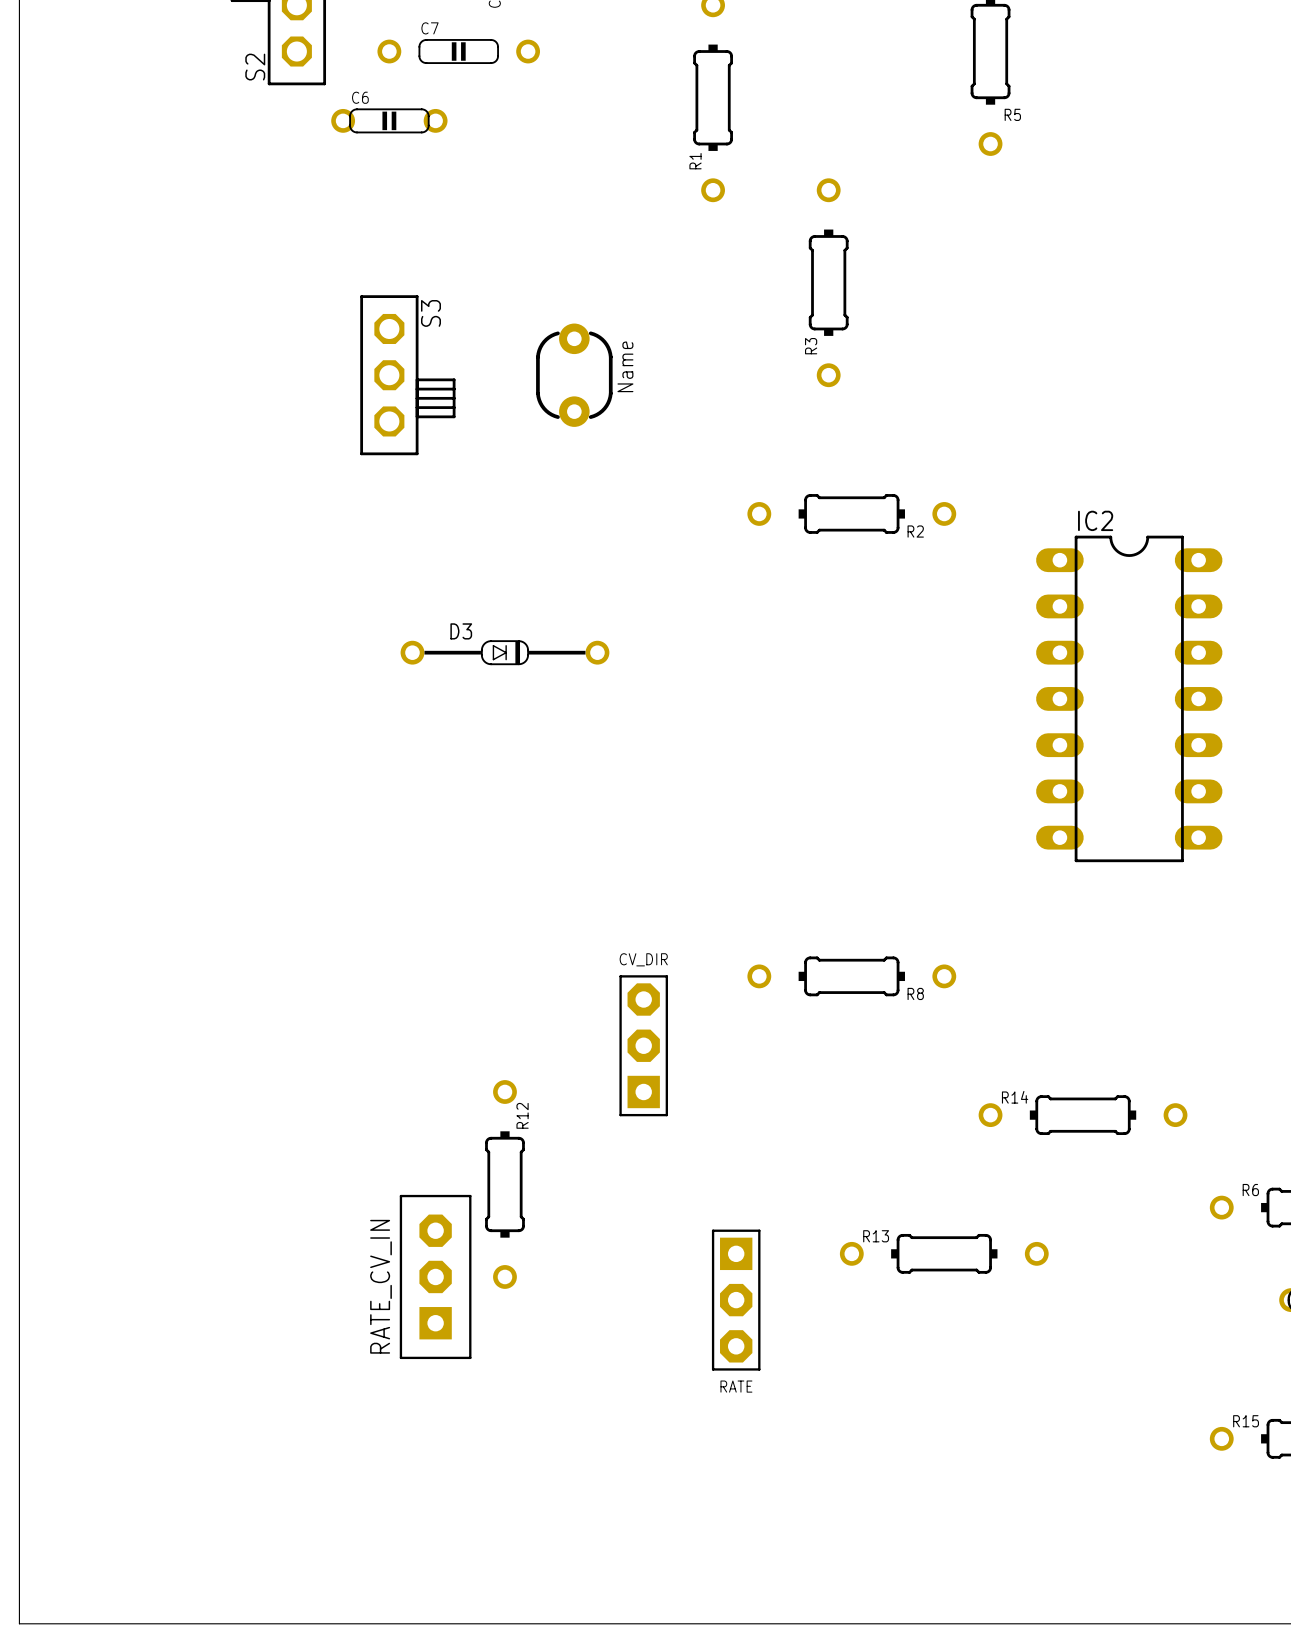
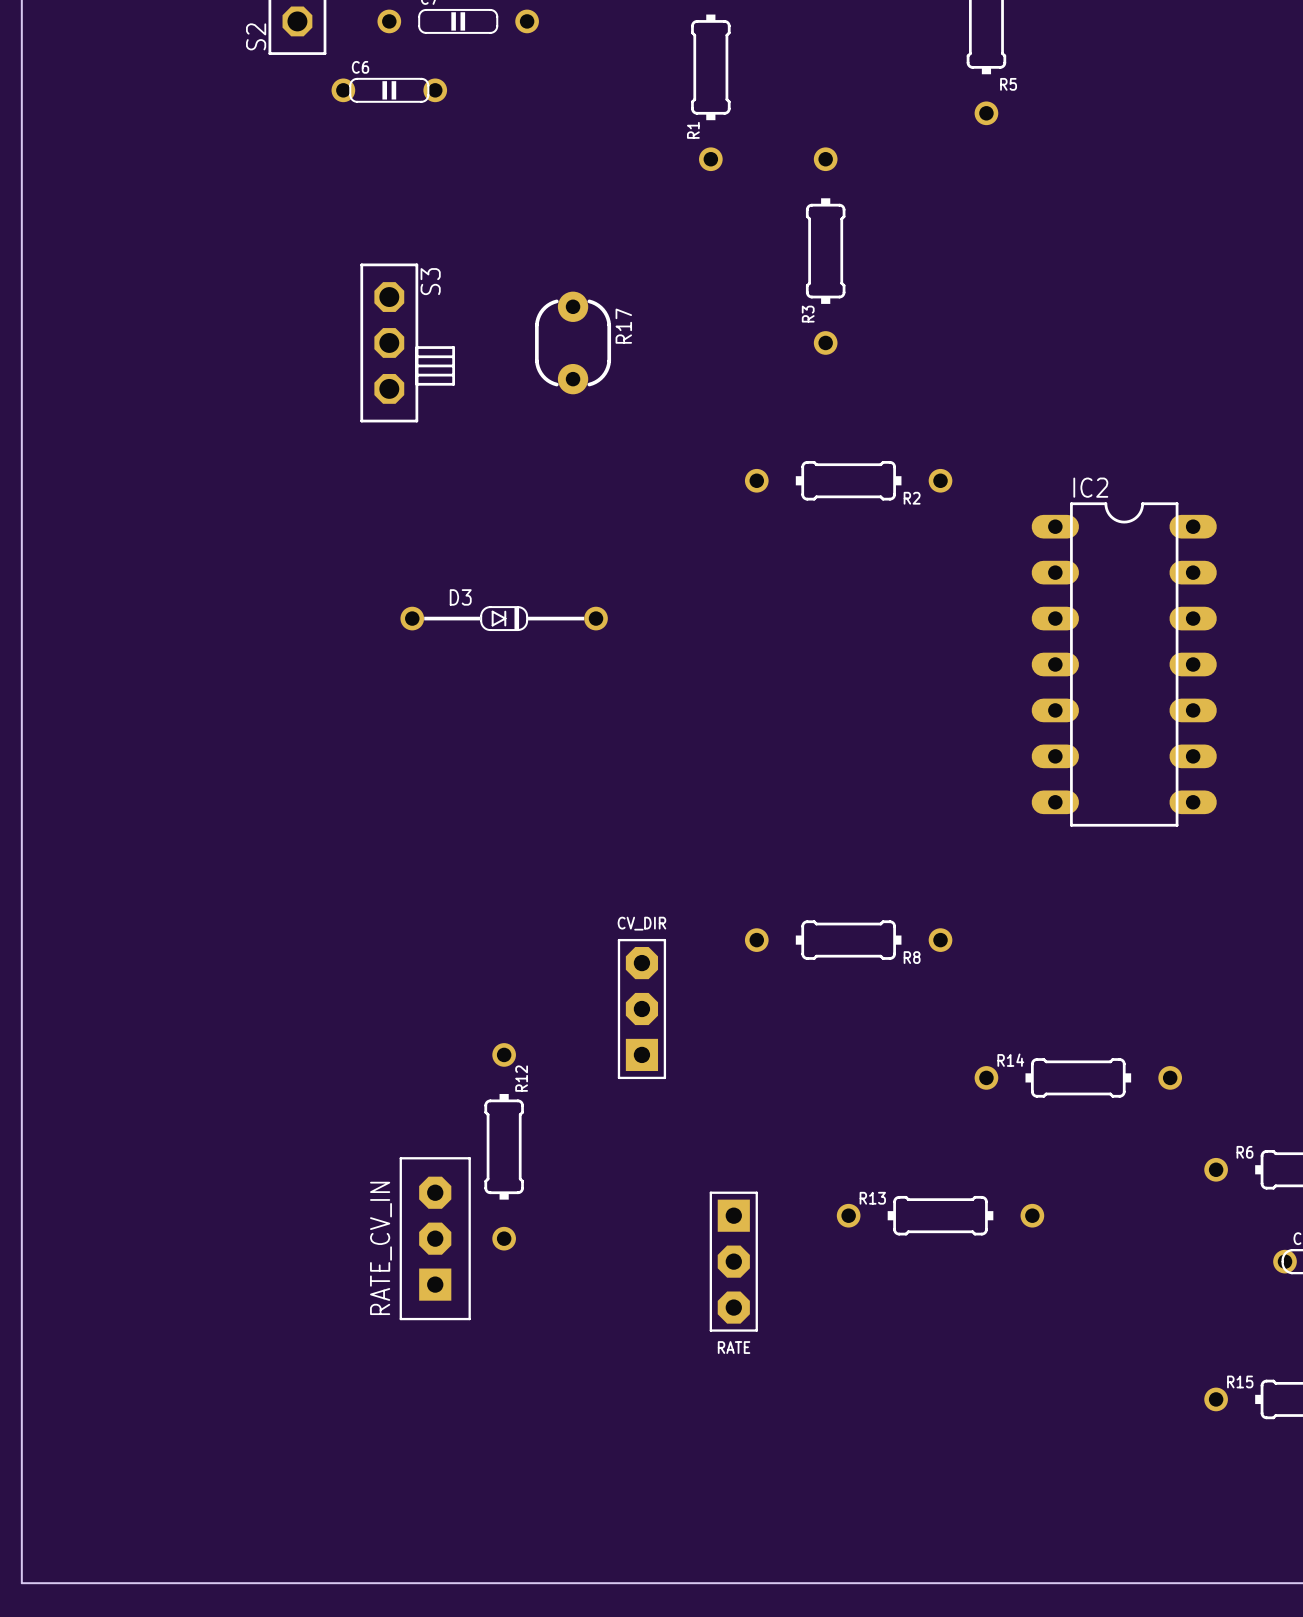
R17 name: none -> R17 (623, 326)
R17 text: Name (625, 366) -> none

